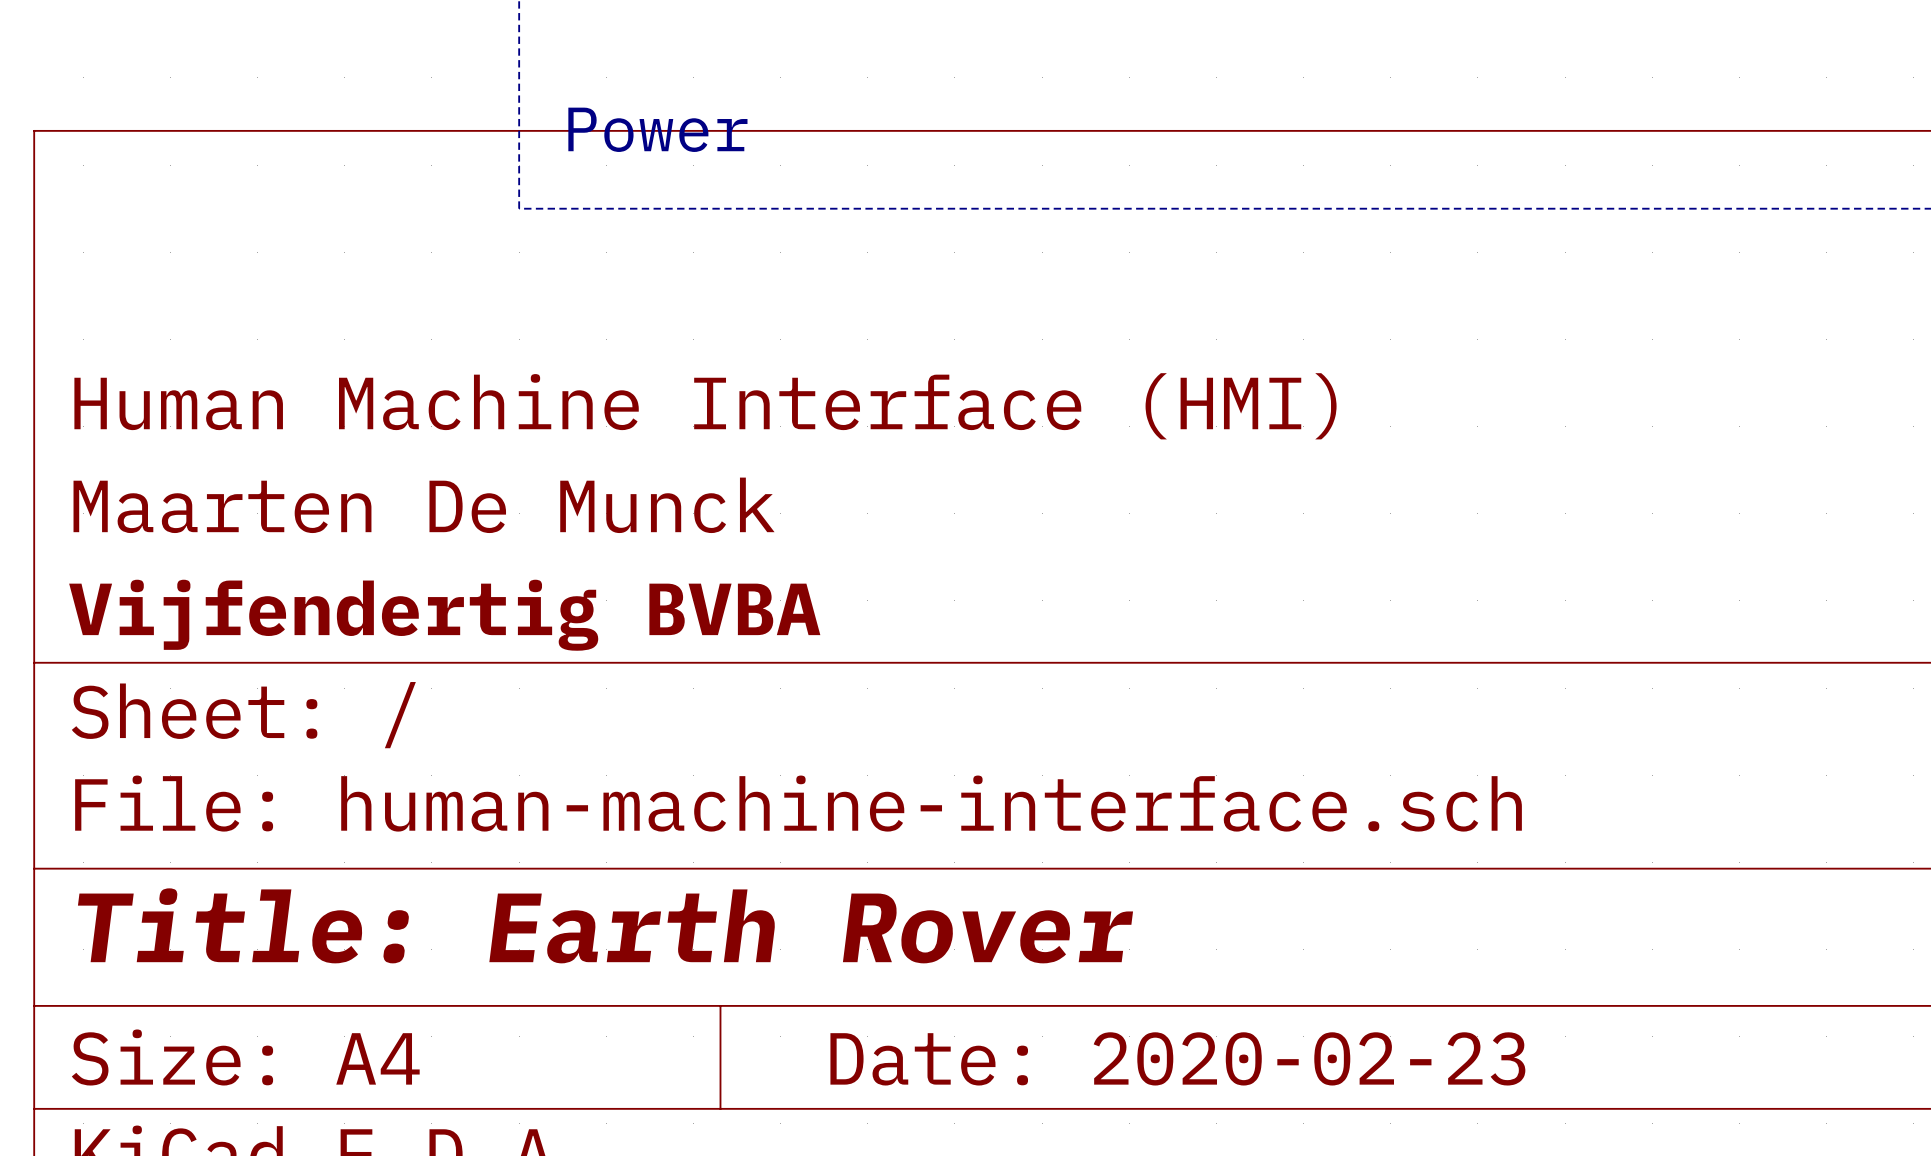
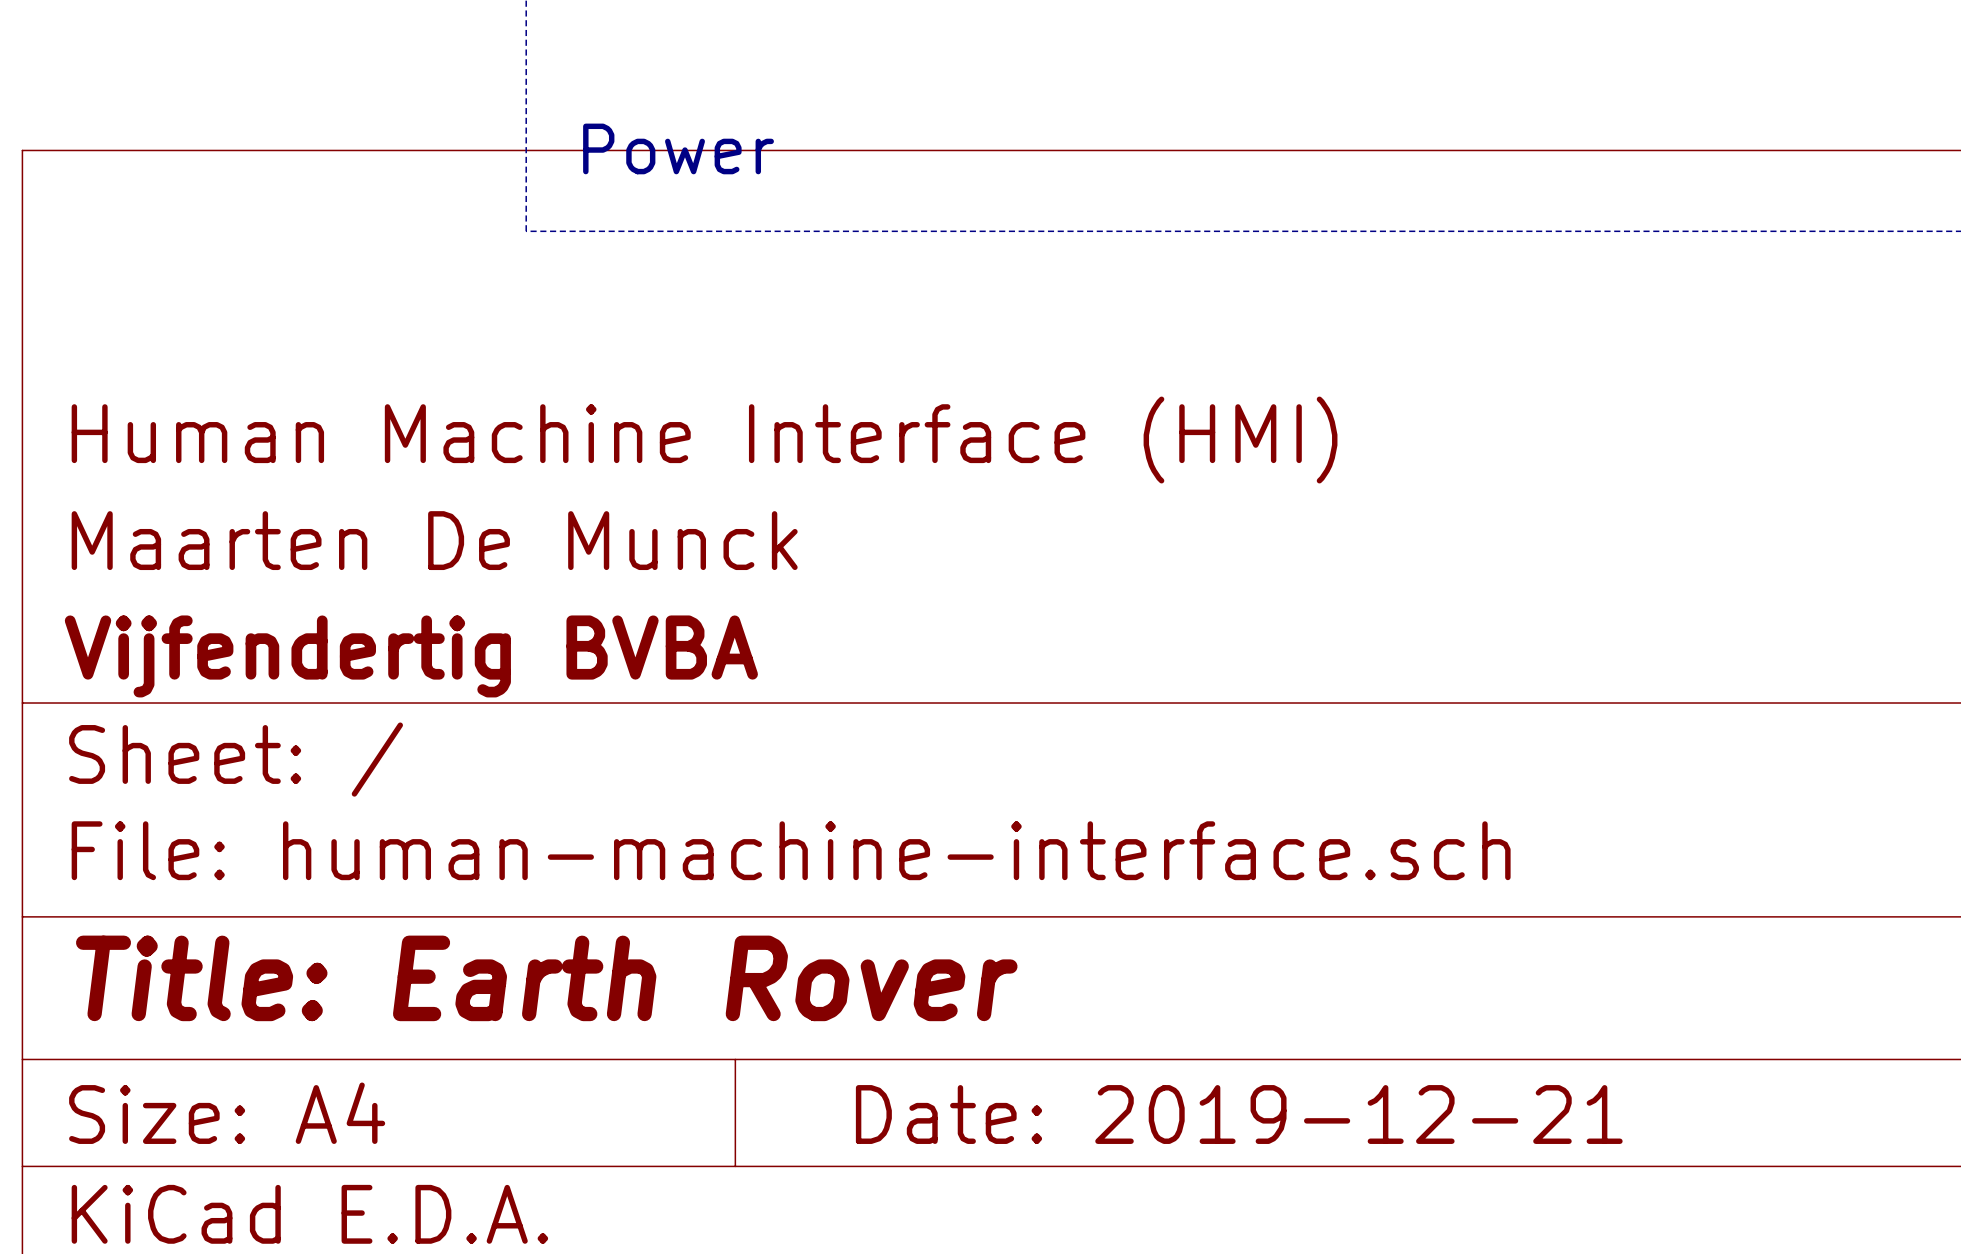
title block: Date: 2020-02-23 (1177, 1058) -> Date: 2019-12-21 (1239, 1114)

